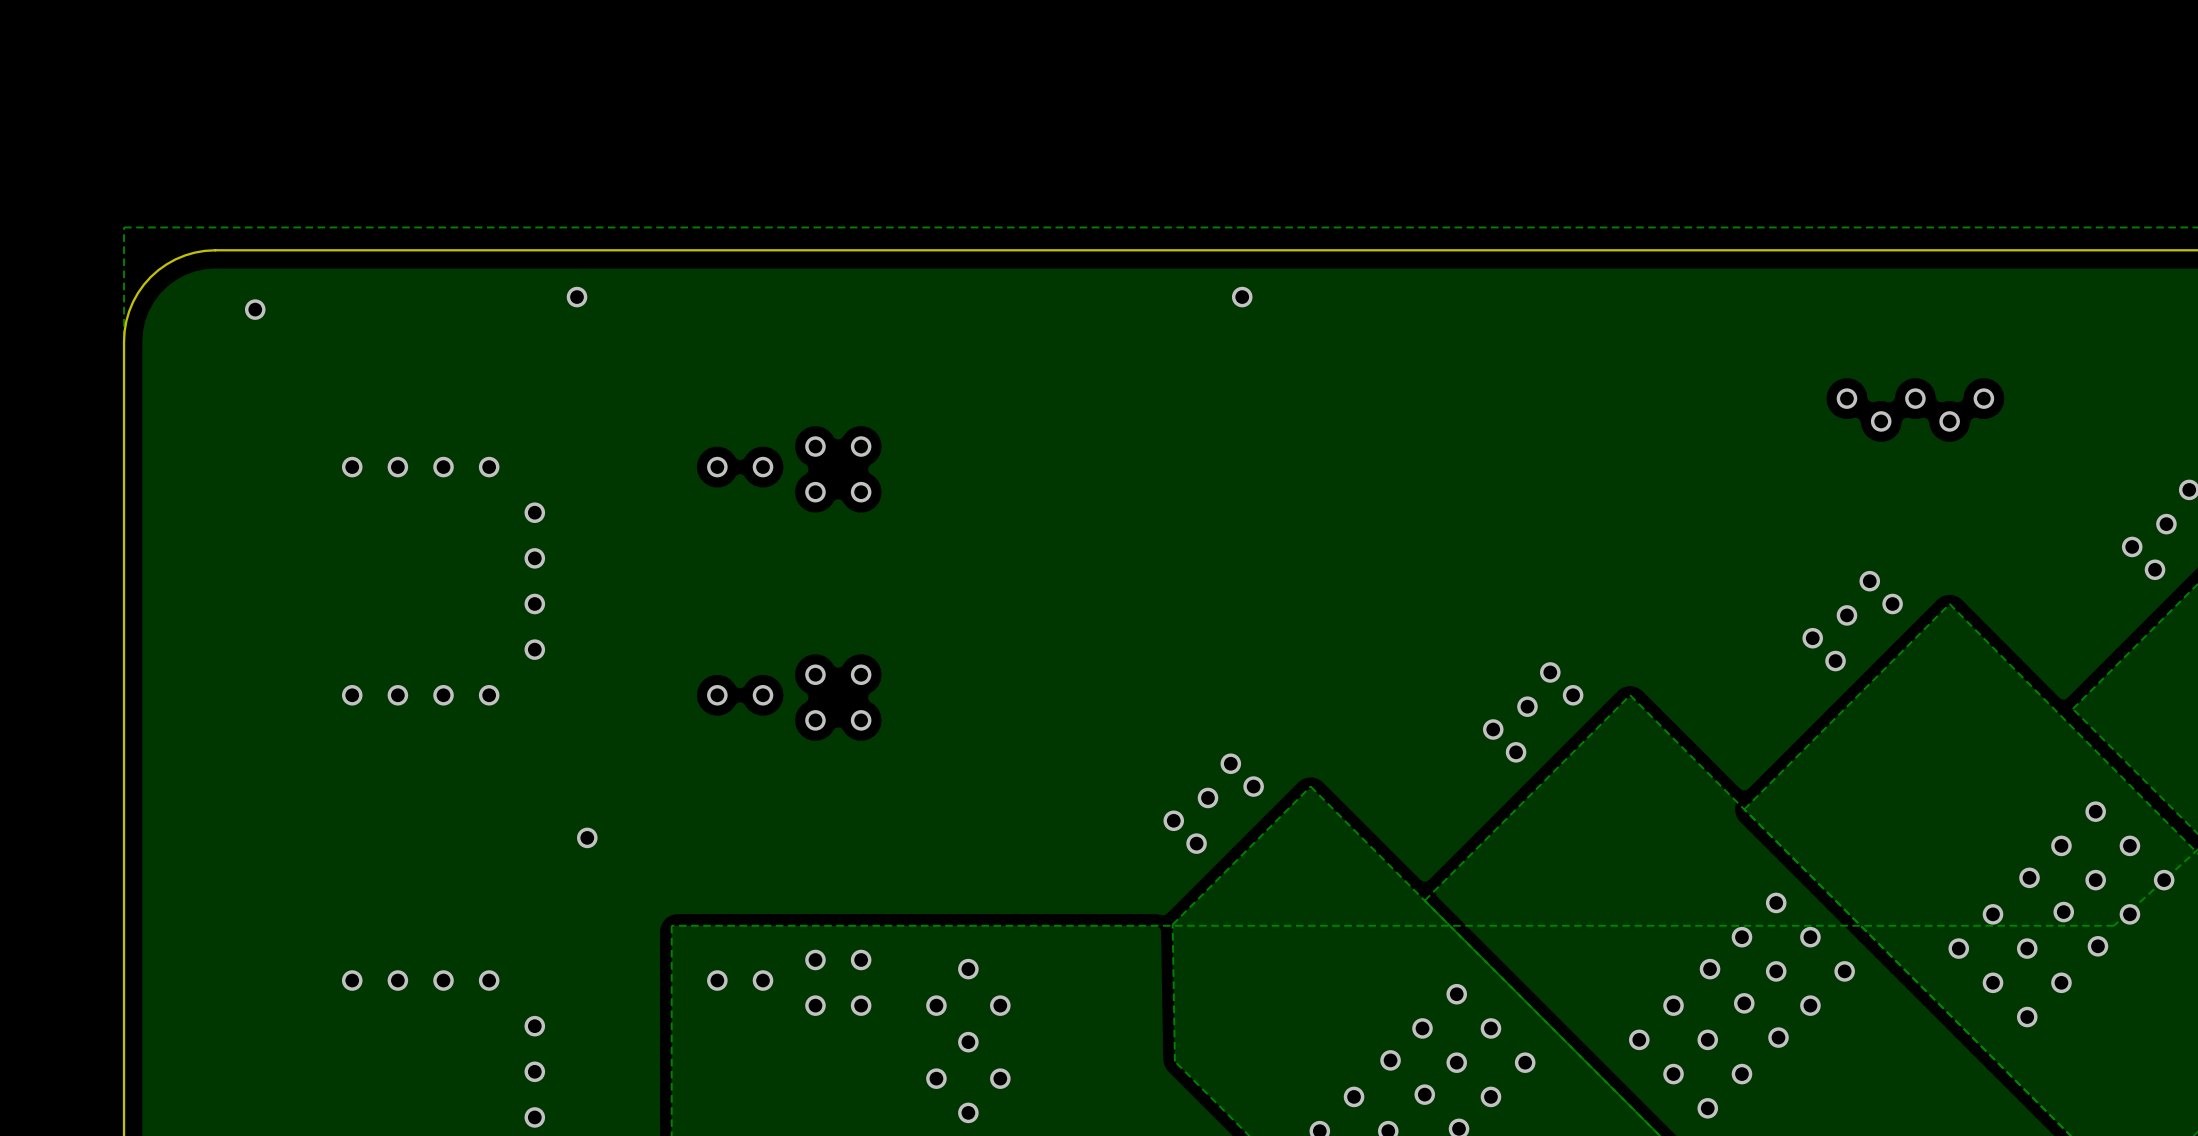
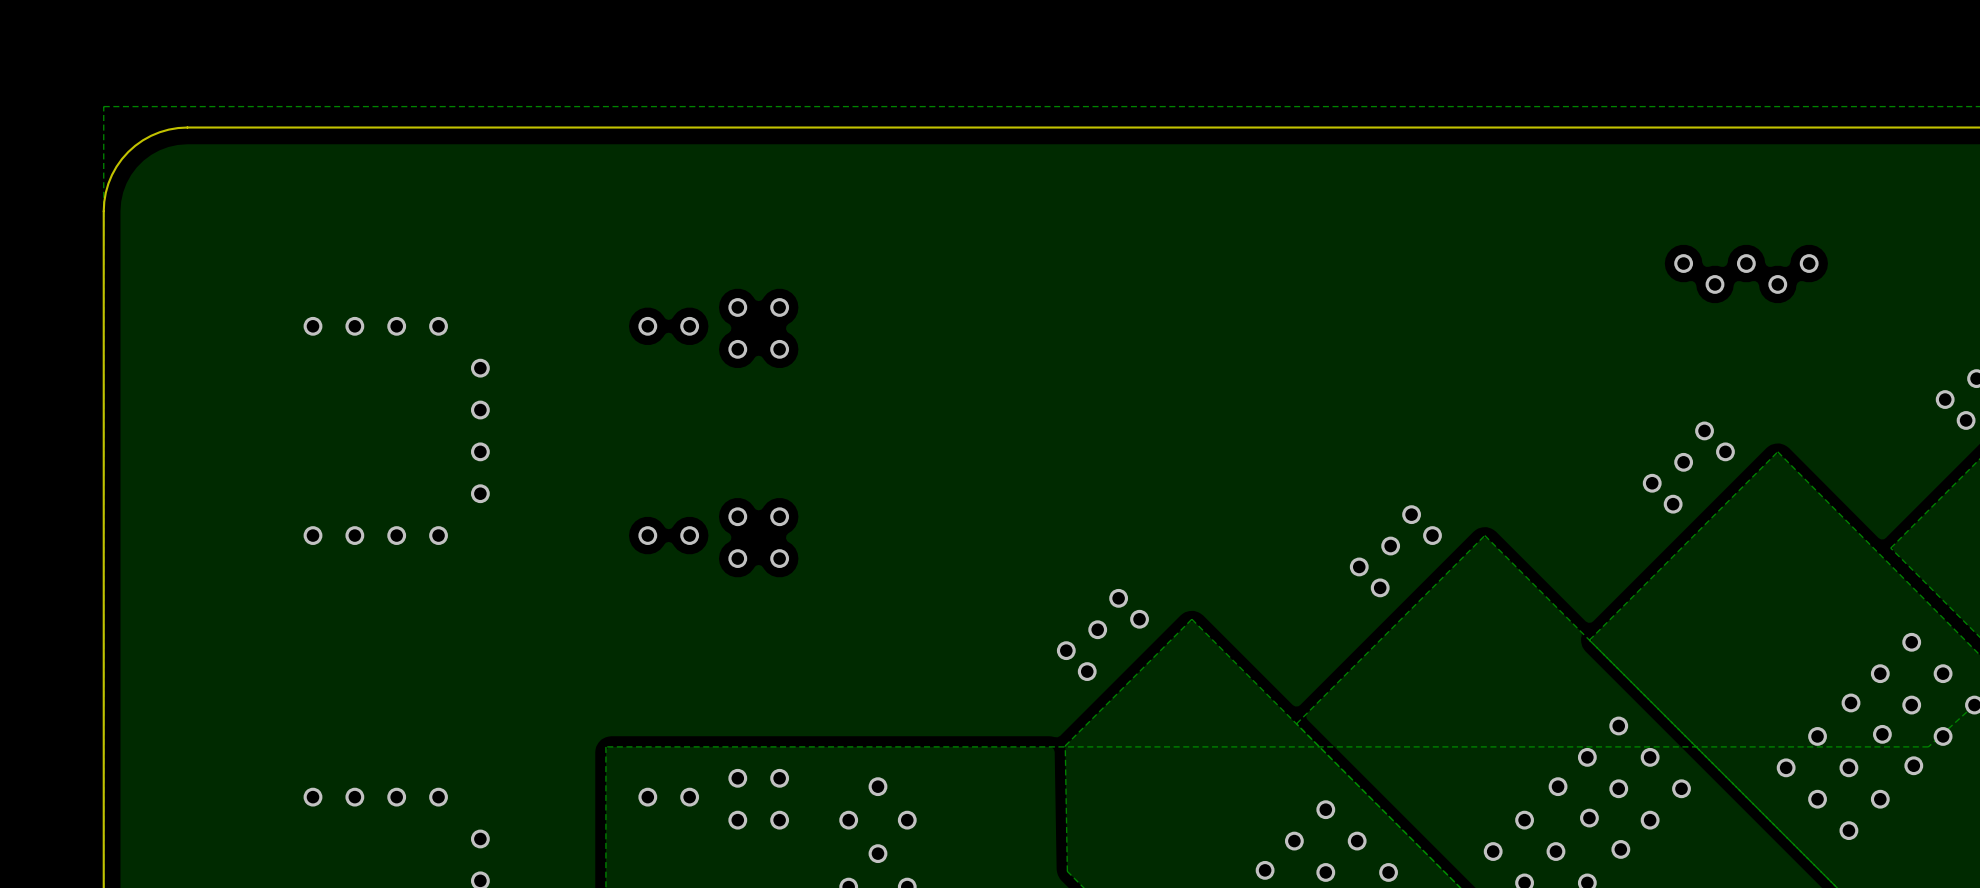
via: (577, 297) -> none
via: (1242, 297) -> none
via: (255, 309) -> none
via: (587, 837) -> none

